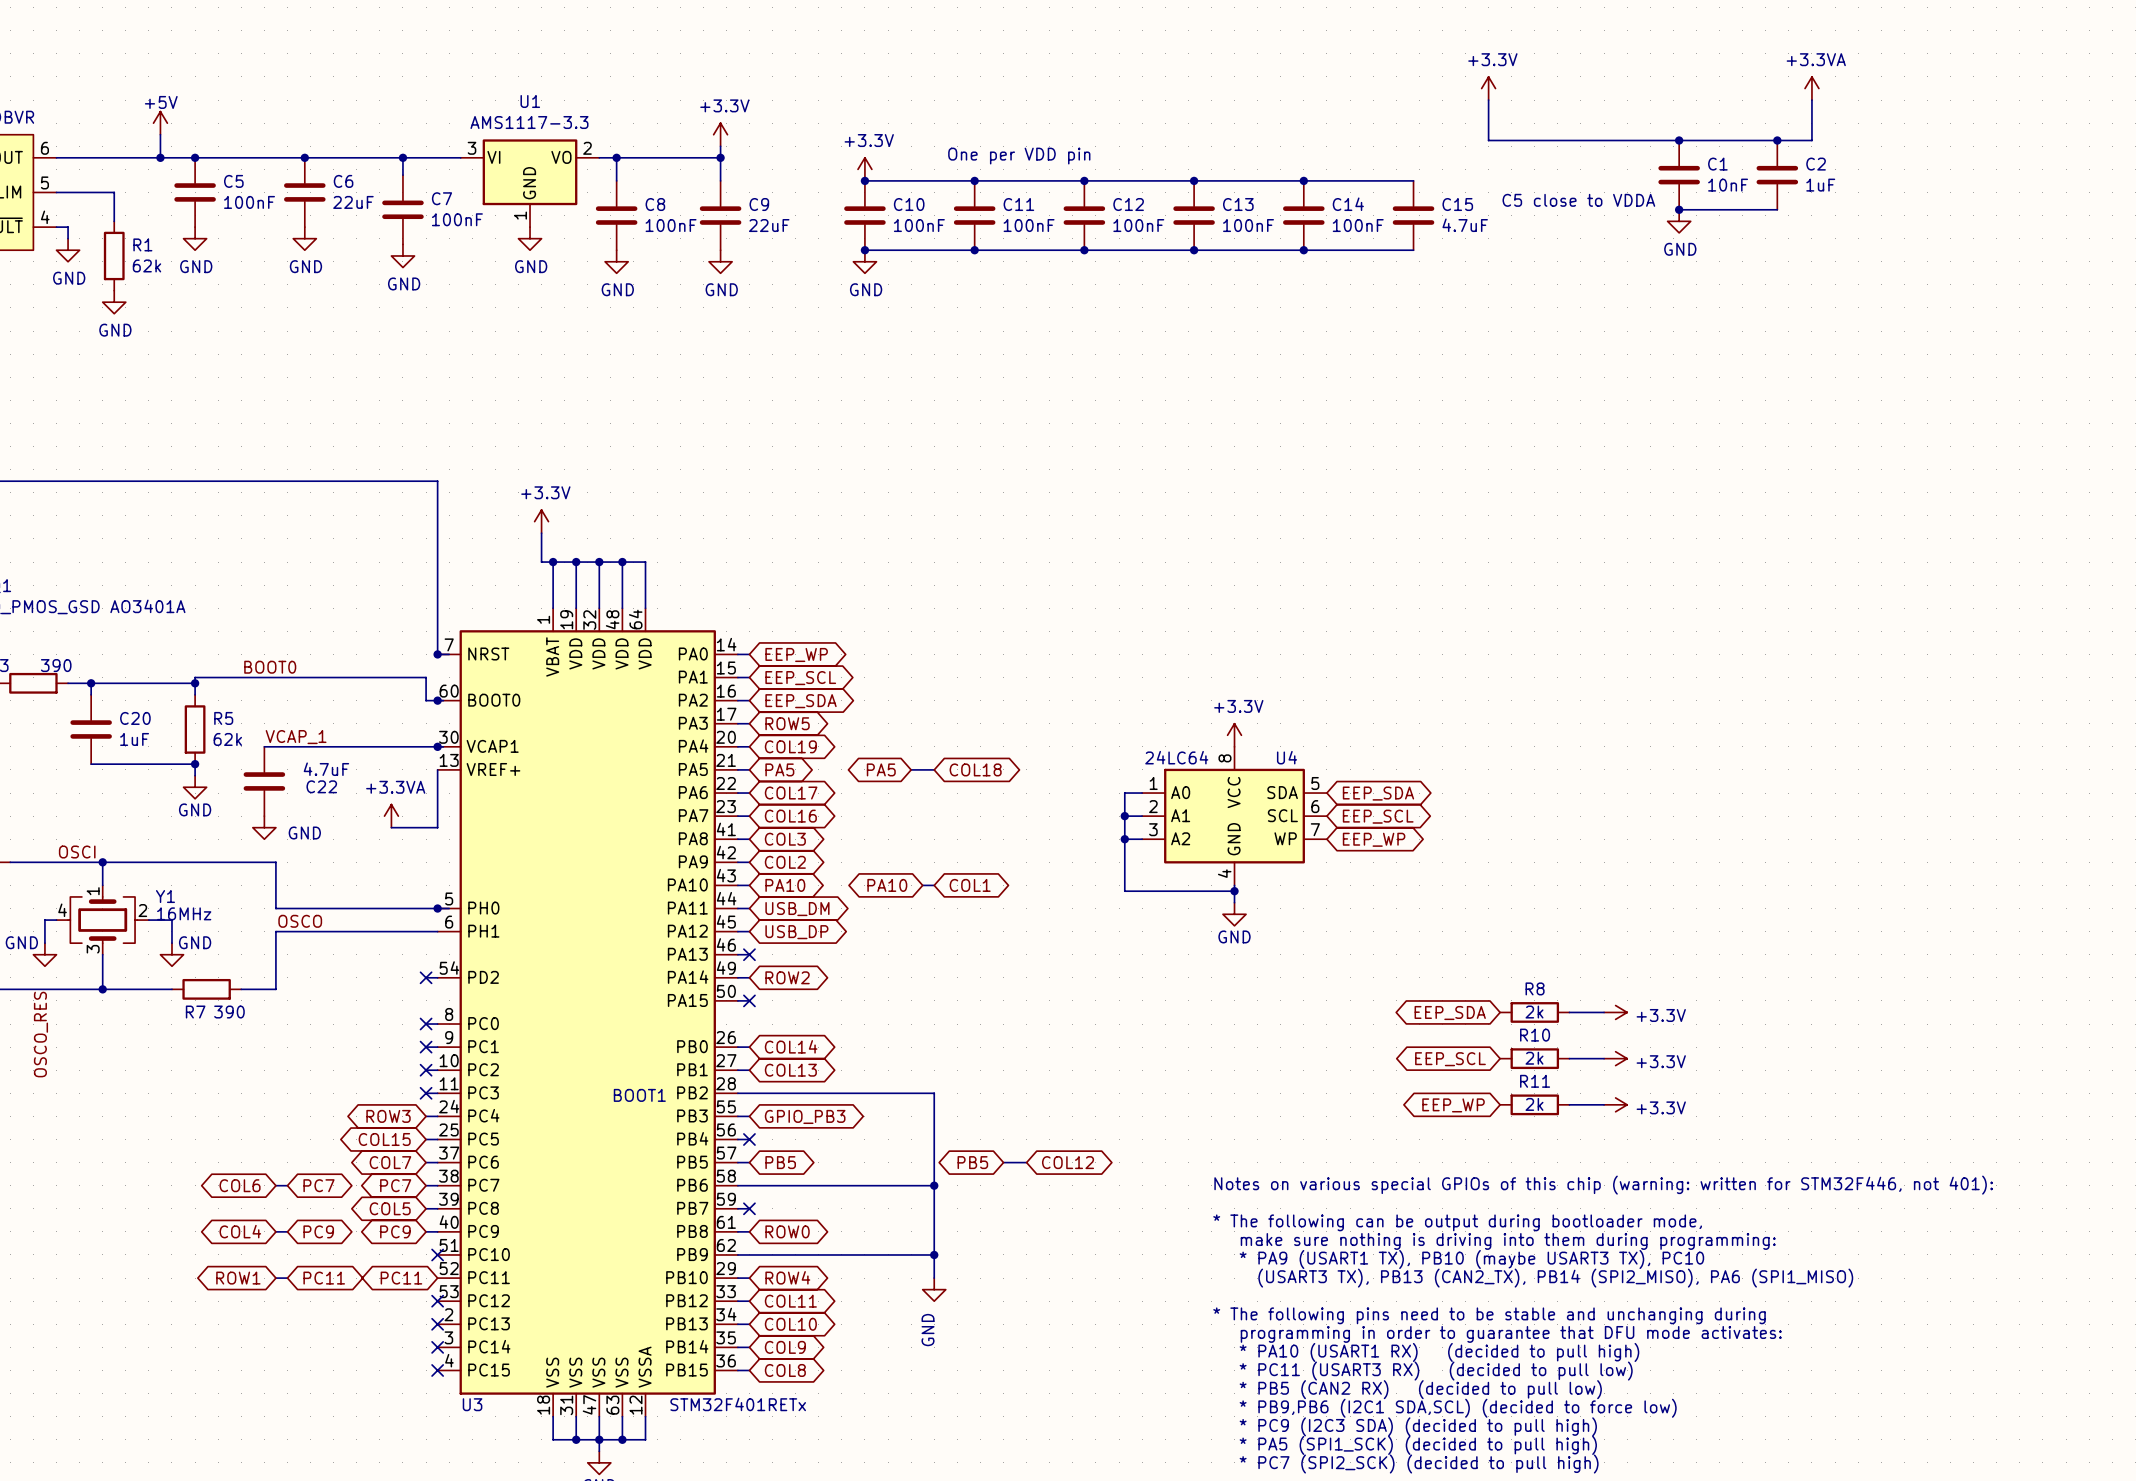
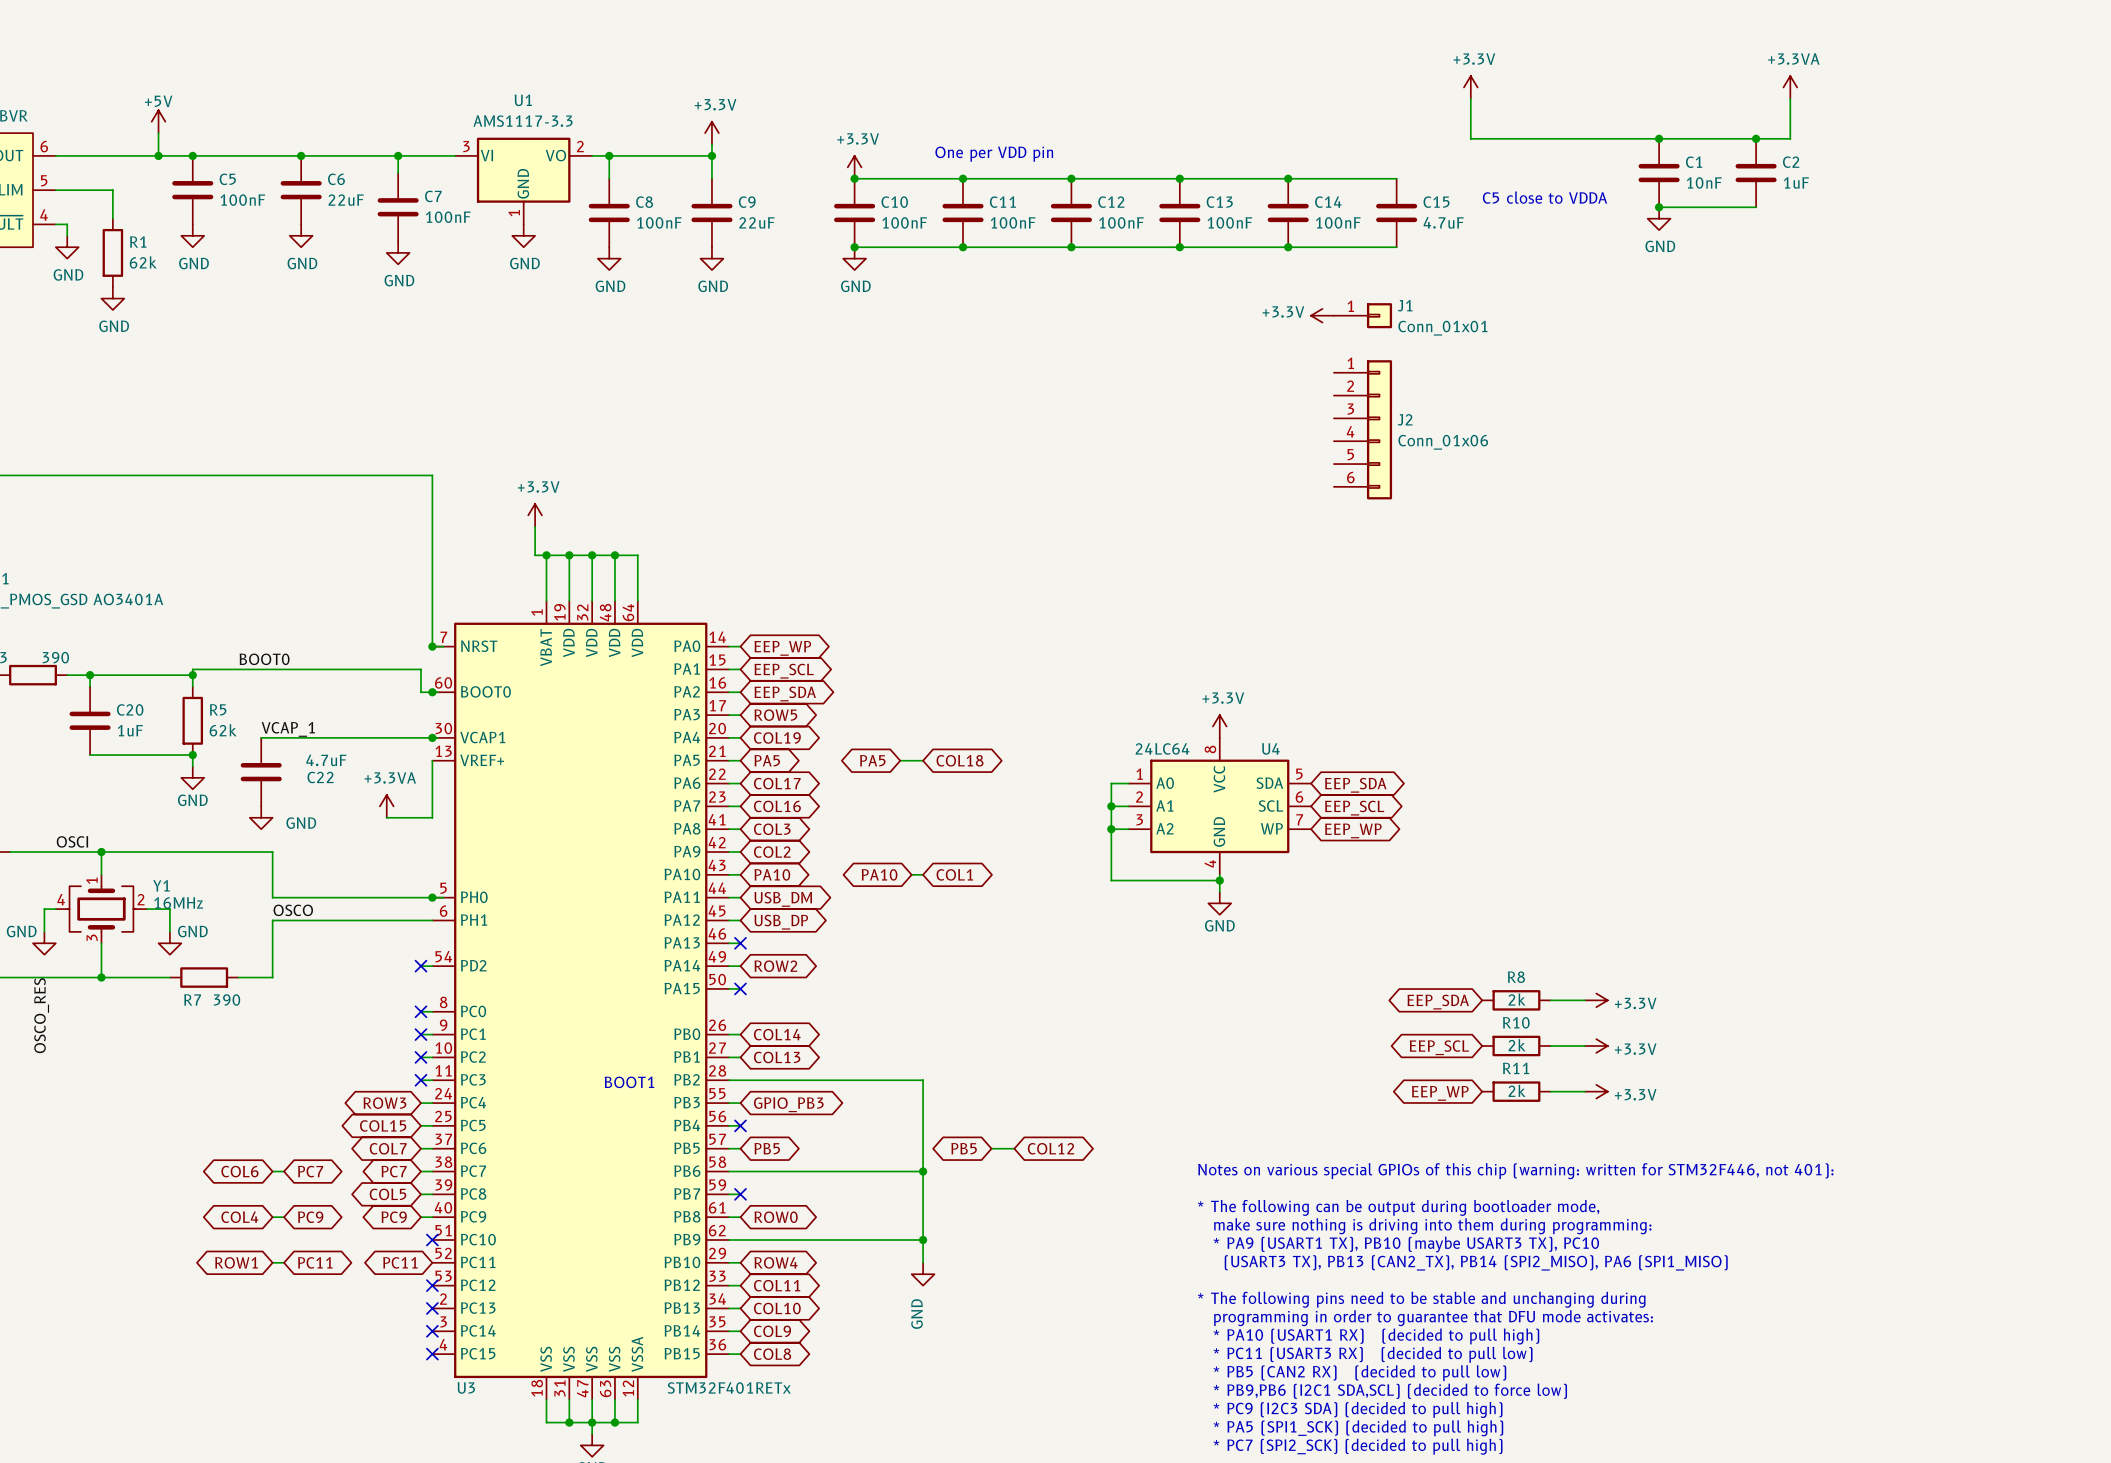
power symbol: none -> +3.3V (1322, 315)
J1: none -> Conn_01x01 (1362, 315)
J2: none -> Conn_01x06 (1362, 429)

